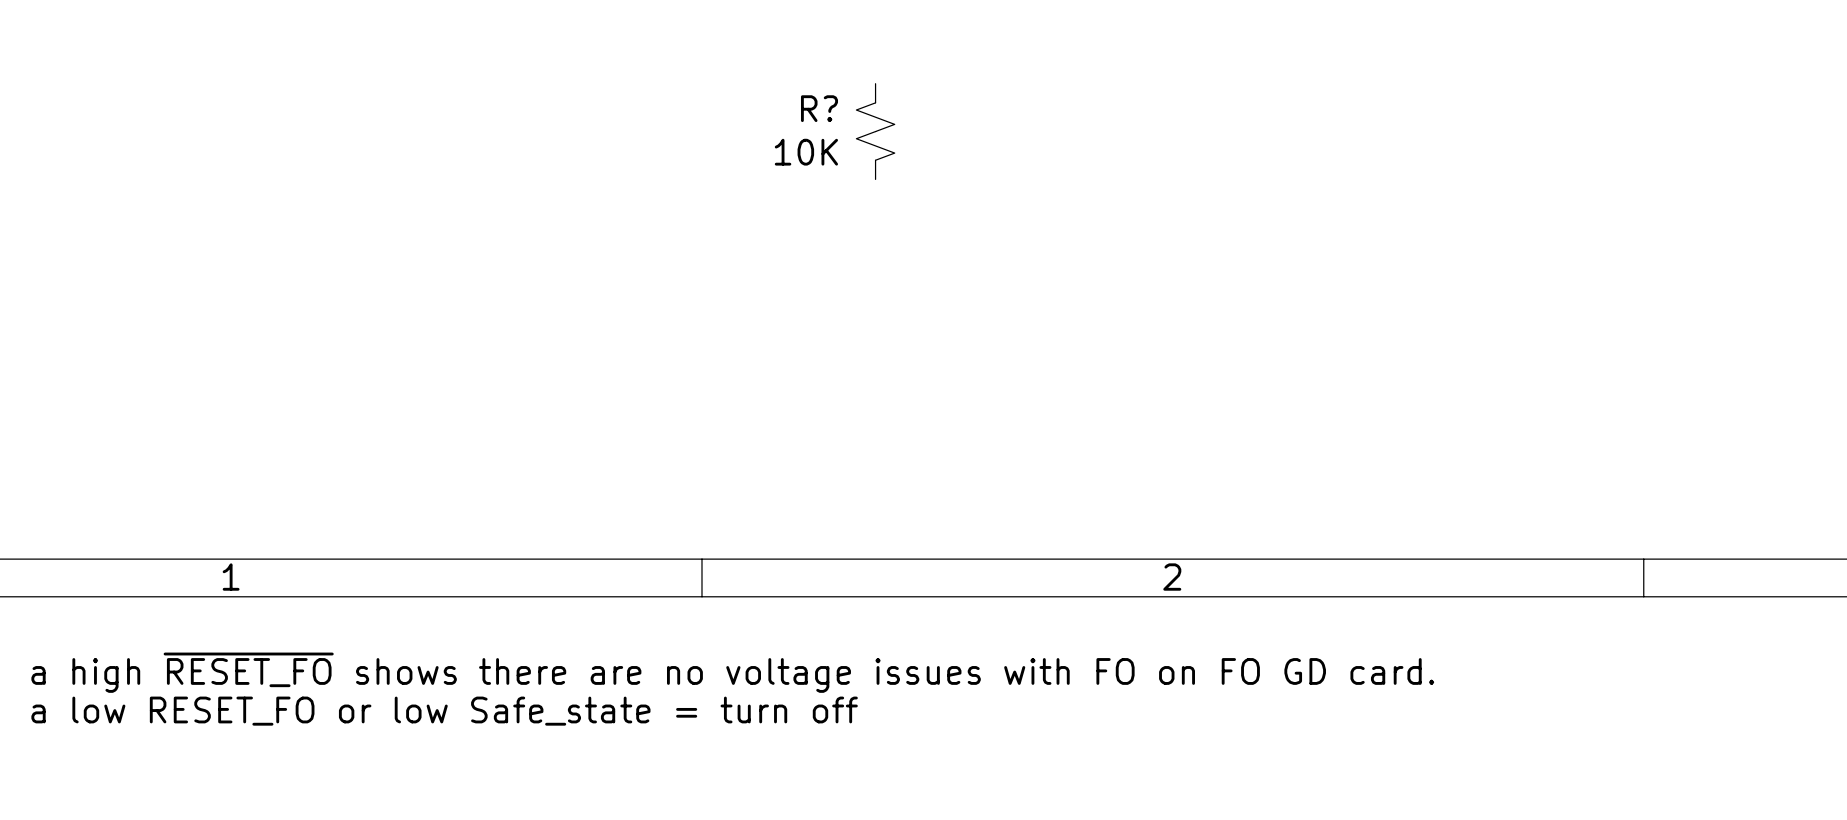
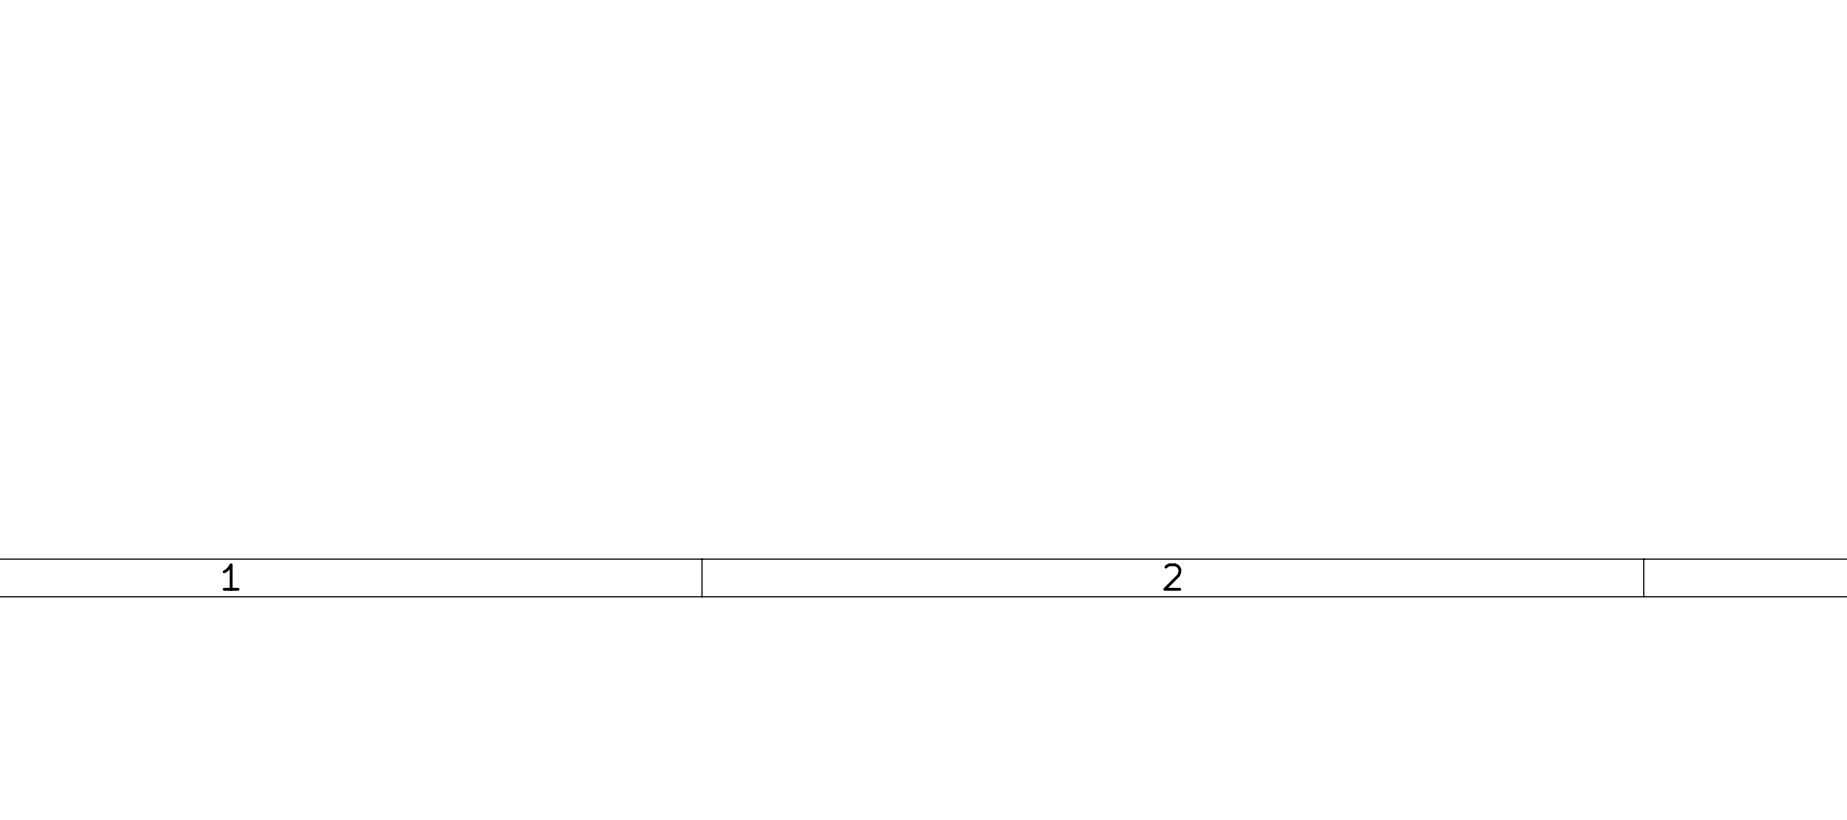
R?: 10K (875, 131) -> none
text: a high ~{RESET_FO} shows there are no voltage issues with FO on FO GD card. (732, 672) -> none
text: a low RESET_FO or low Safe_state = turn off (444, 711) -> none

